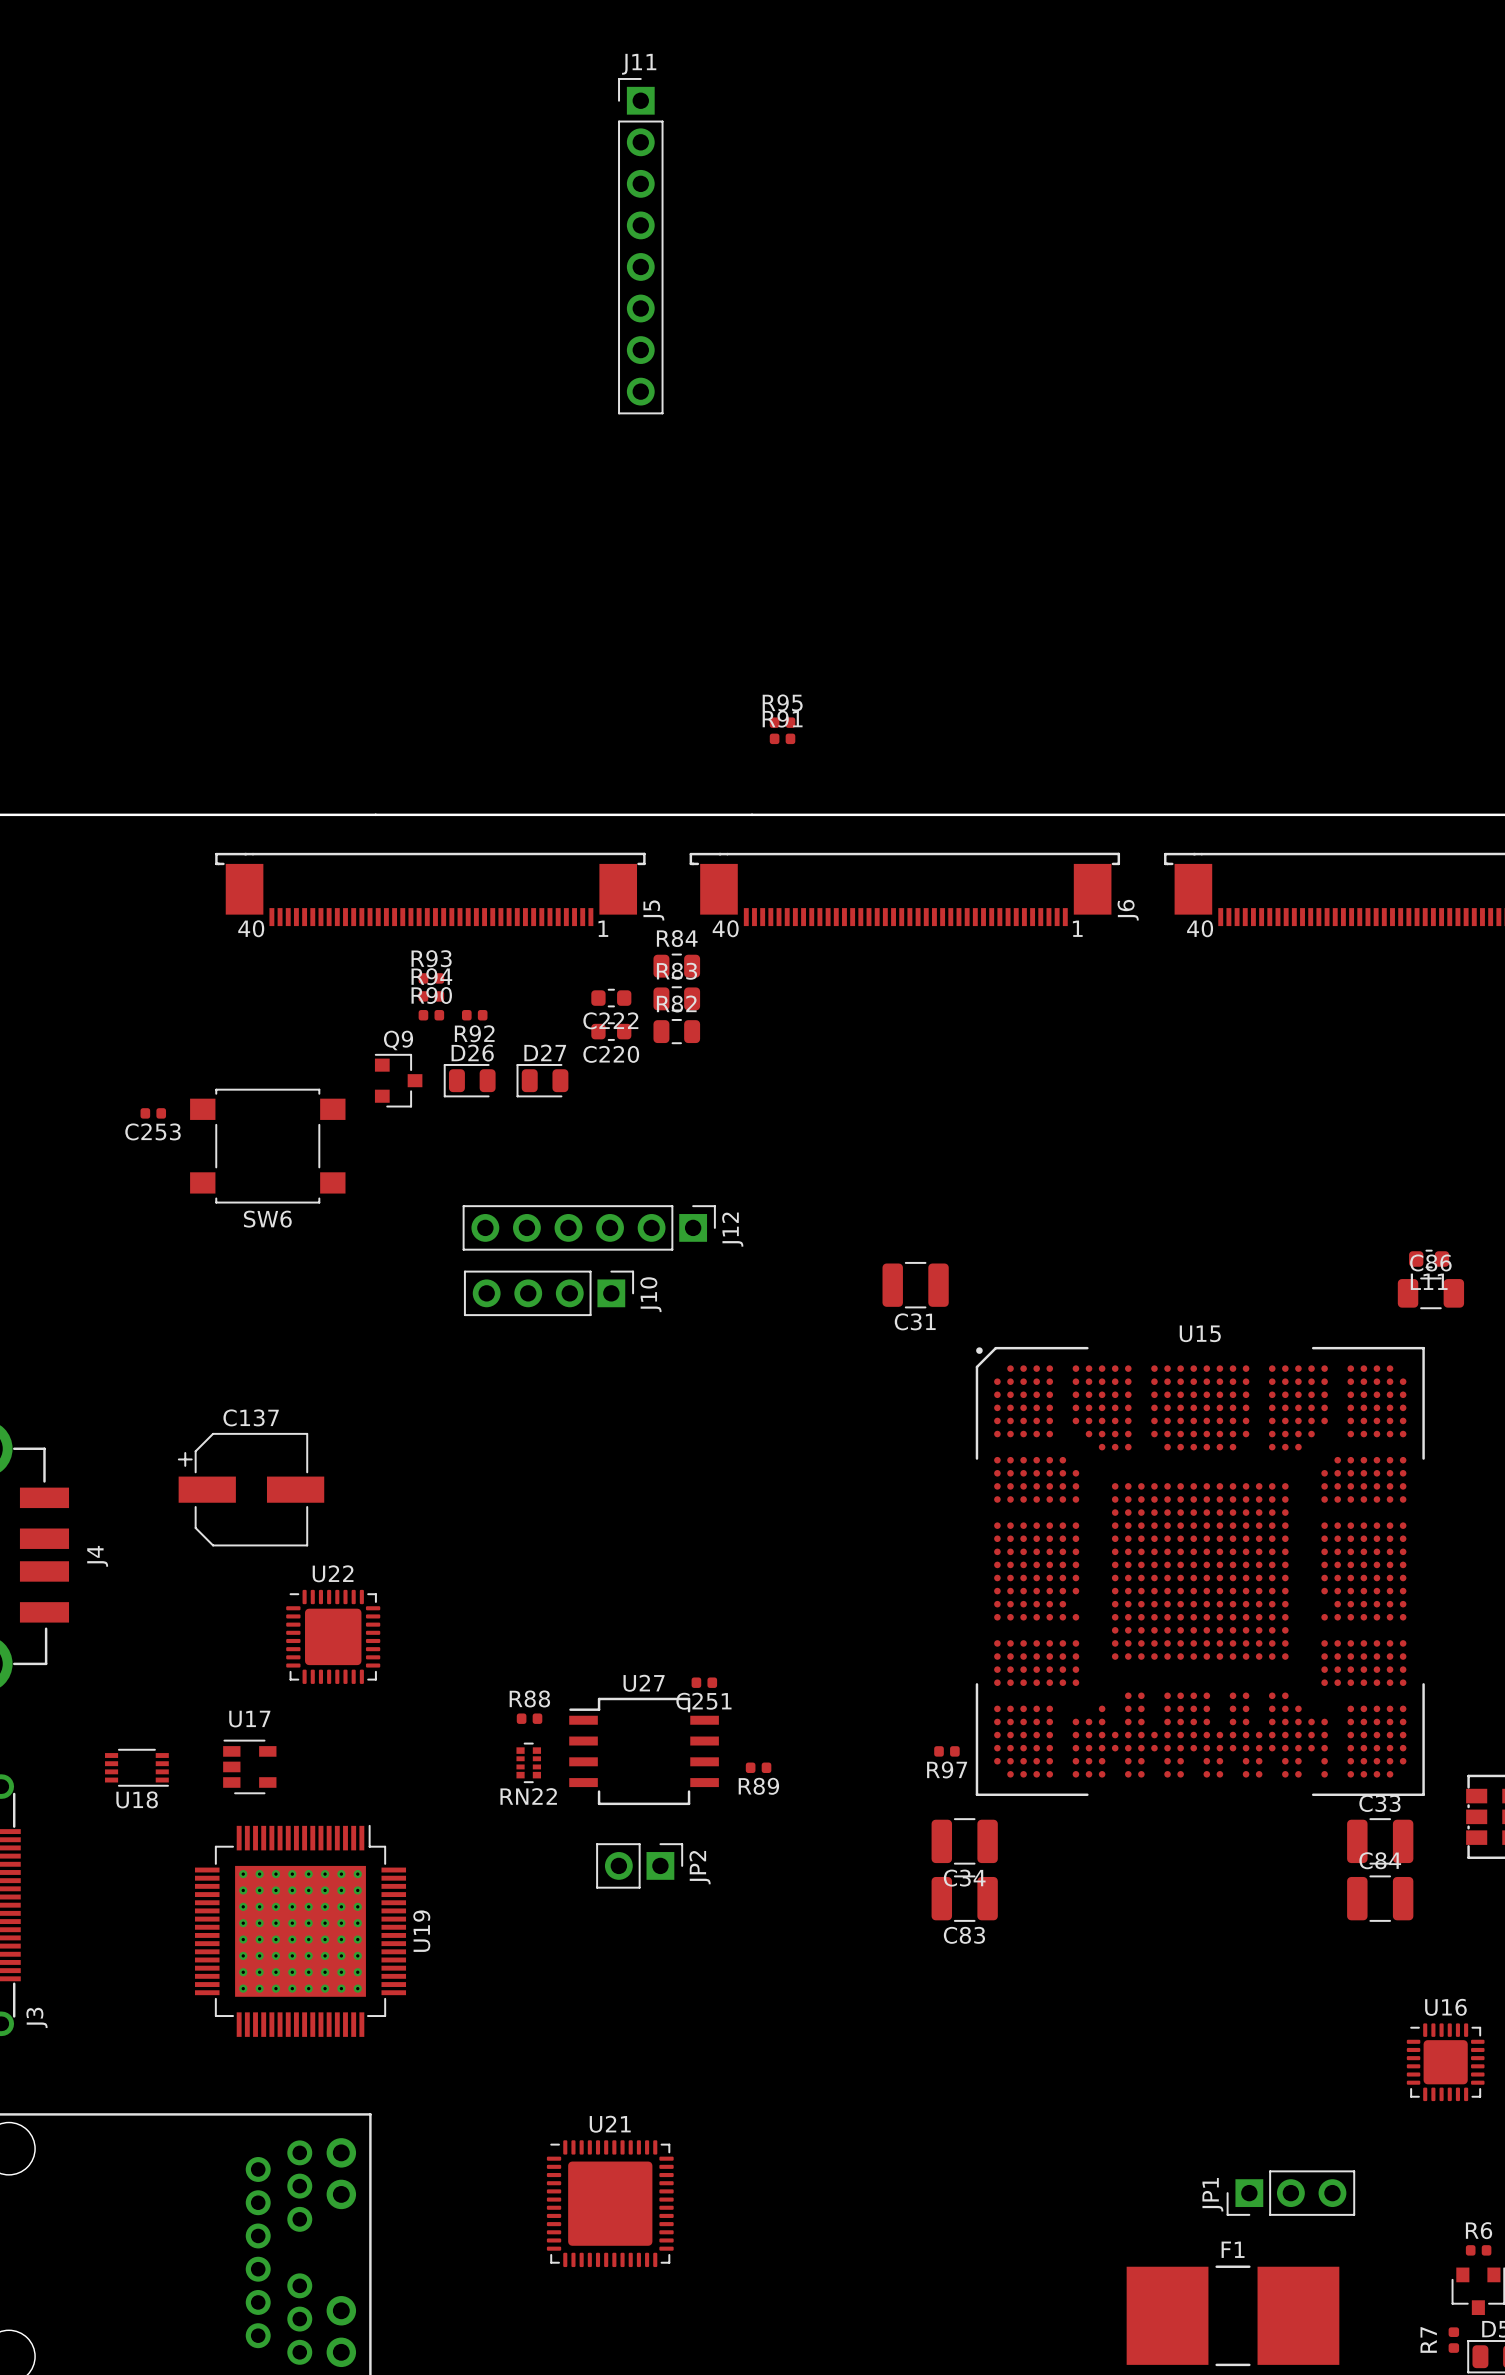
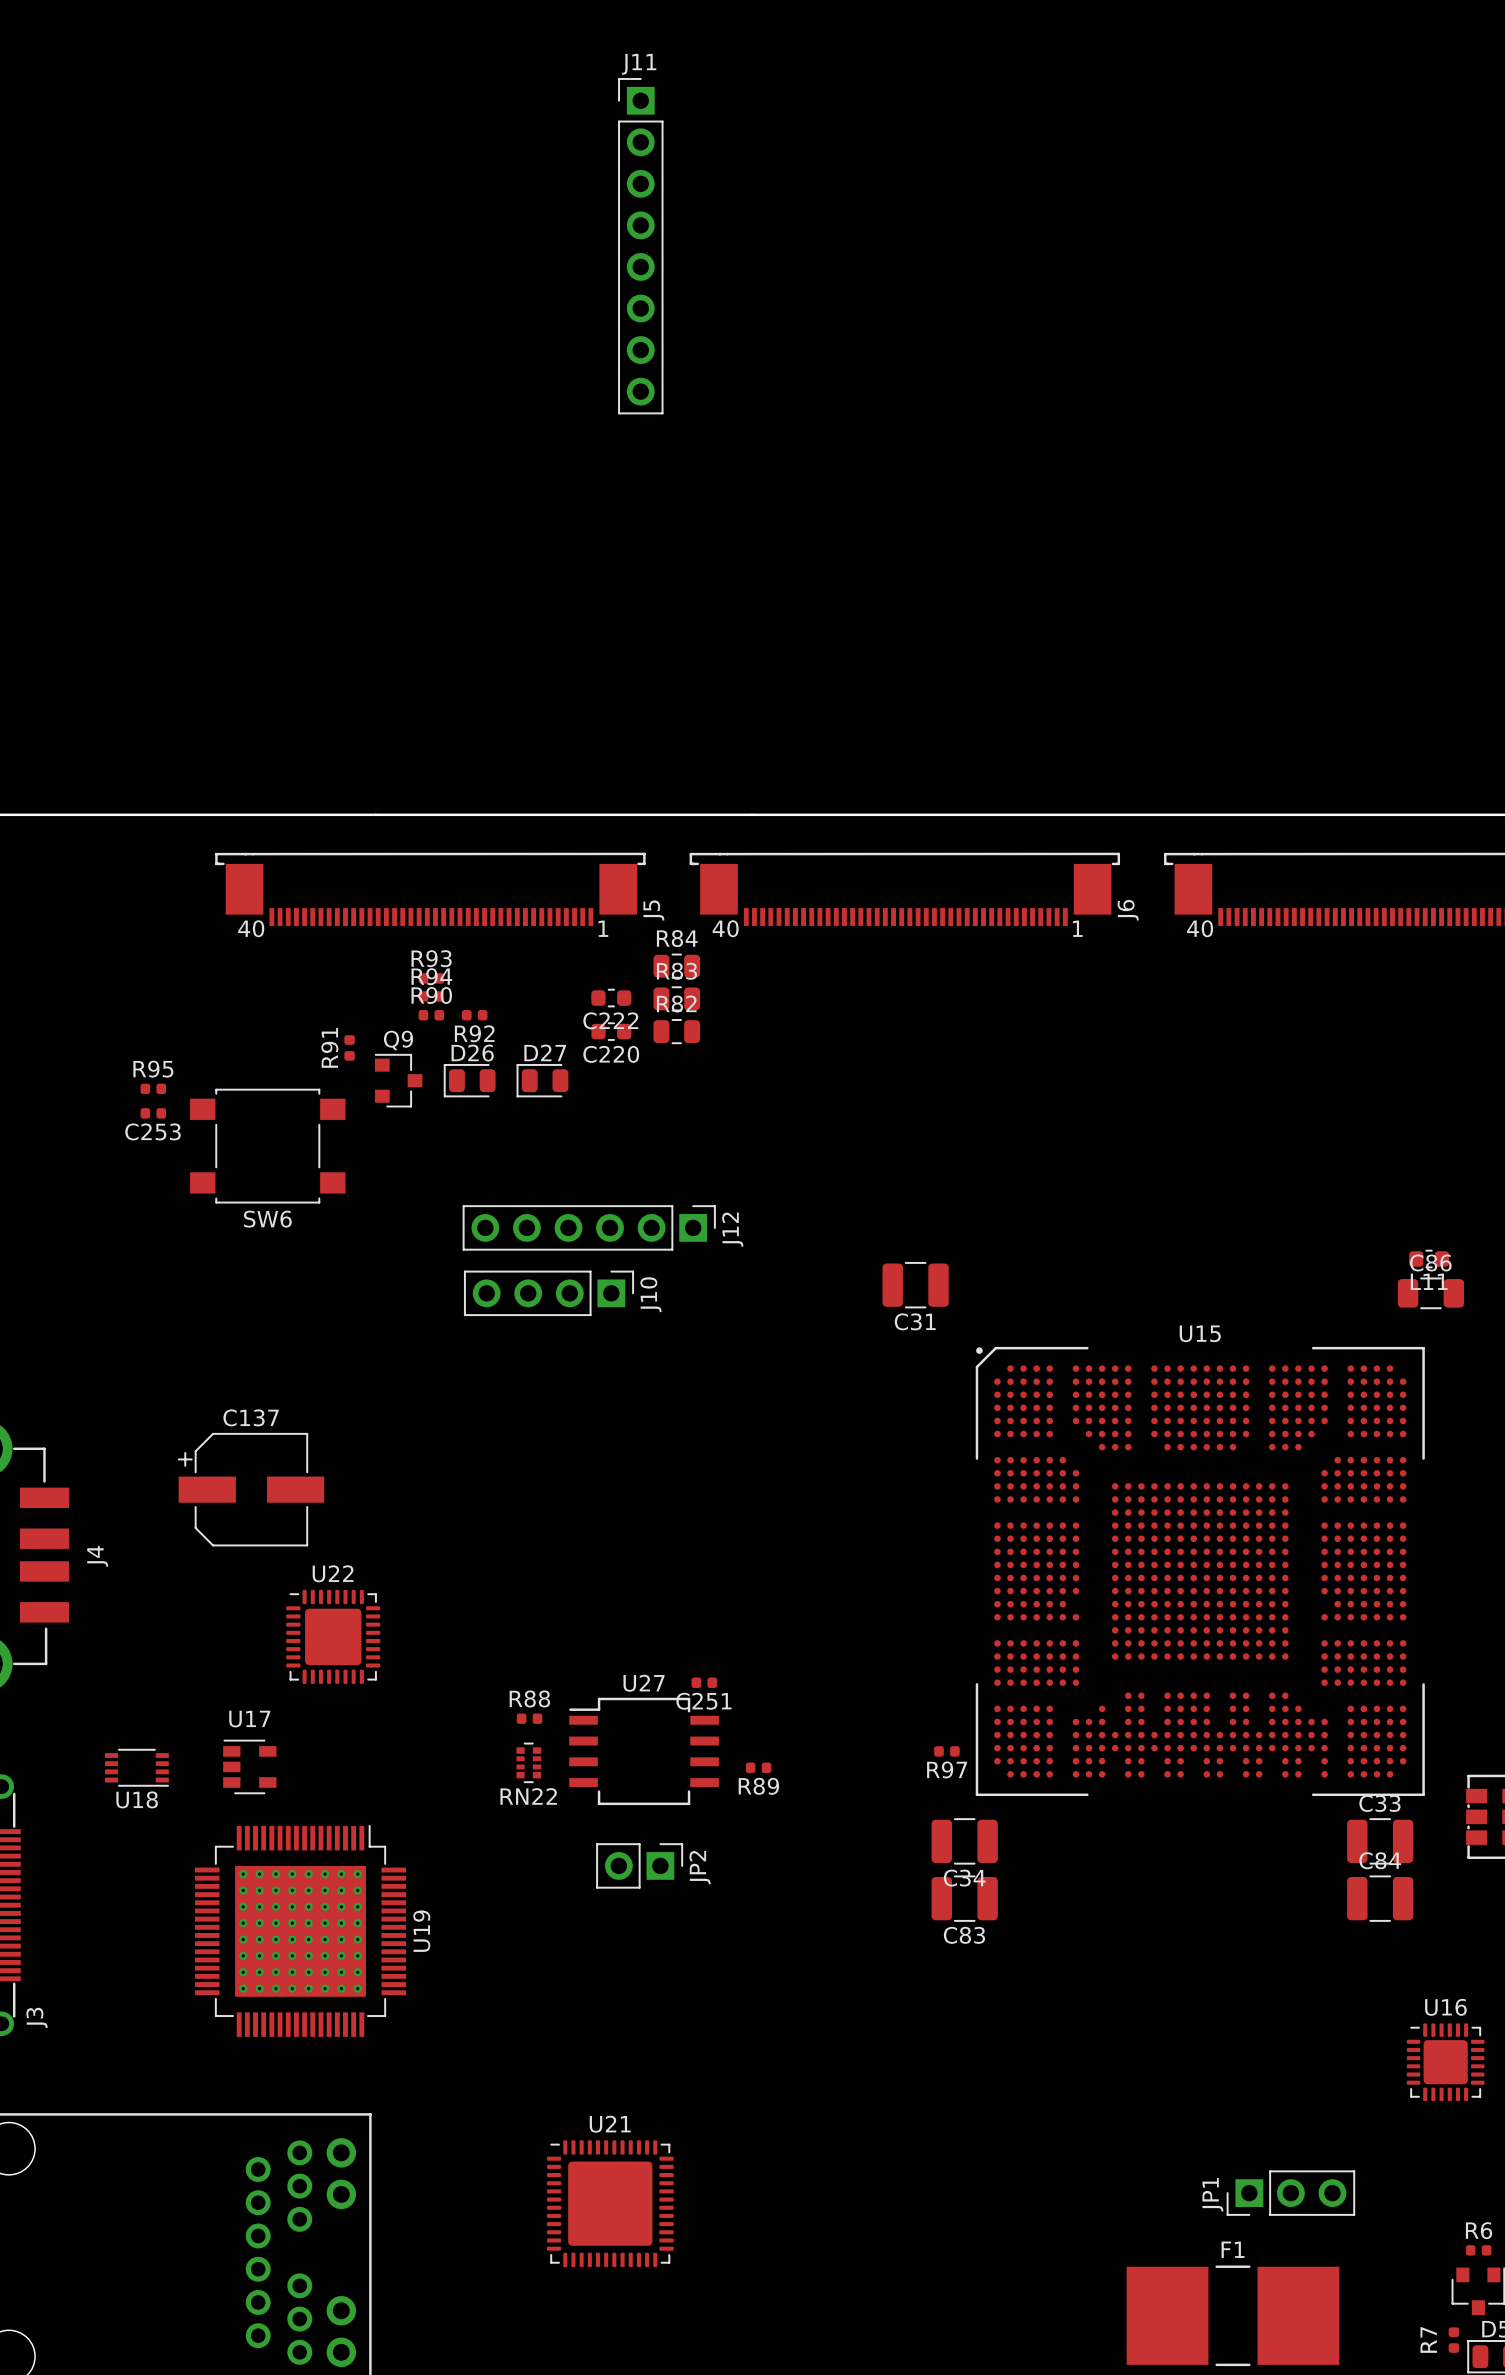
R95 position: (782, 722) -> (153, 1088)
R91 rotation: 0° (782, 738) -> 90° clockwise (349, 1047)
R91 position: (782, 738) -> (349, 1047)

